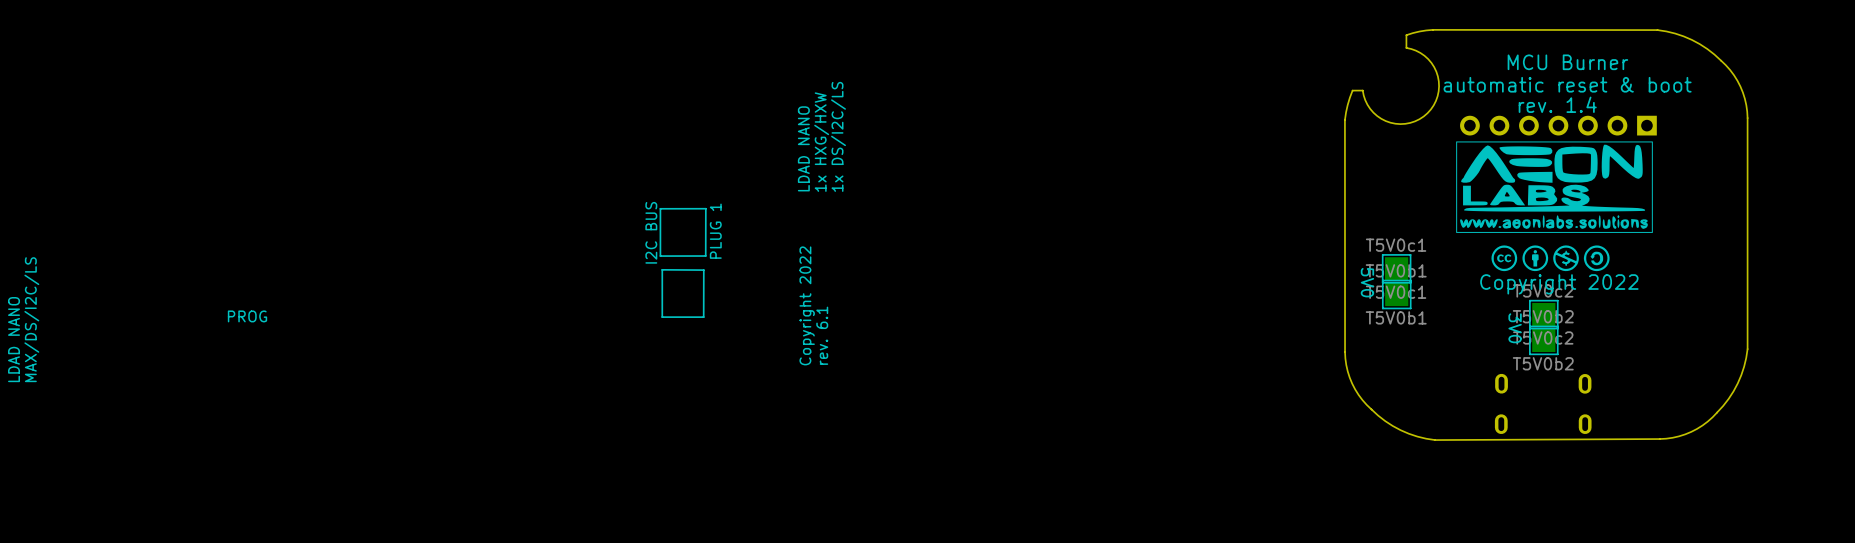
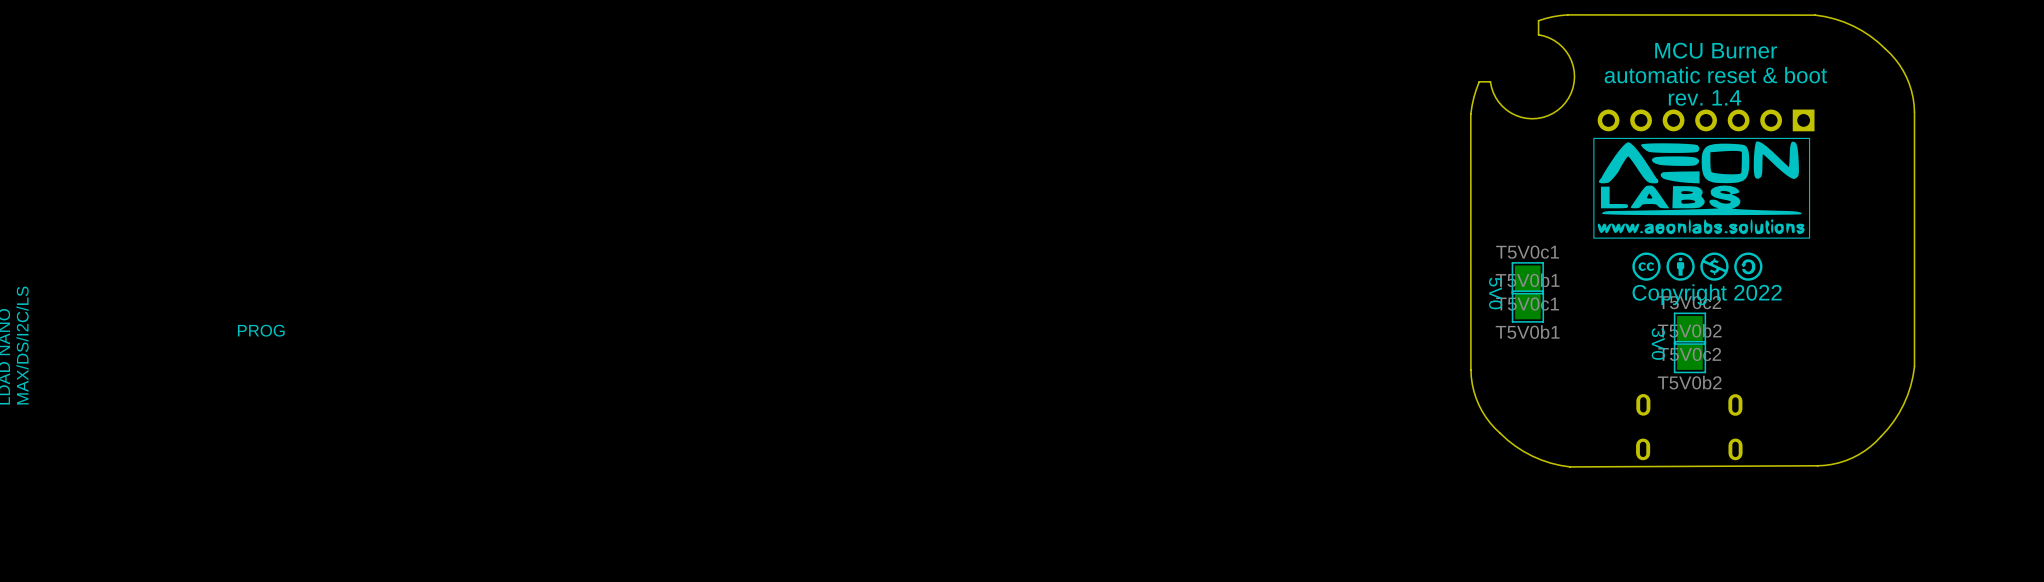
text: 1x DS/I2C/LS (838, 136) -> none
text: 1x HXG/HXW (821, 142) -> none
text: LDAD NANO (803, 148) -> none
line: (705, 208) (660, 208) (660, 256) (705, 256) (705, 208) -> none
text: PLUG 1 (715, 231) -> none
text: I2C BUS (651, 232) -> none
line: (662, 269) (703, 270) (703, 317) (662, 317) (662, 269) -> none
text: Copyright 2022 (807, 305) -> none
text: rev. 6.1 (822, 335) -> none

